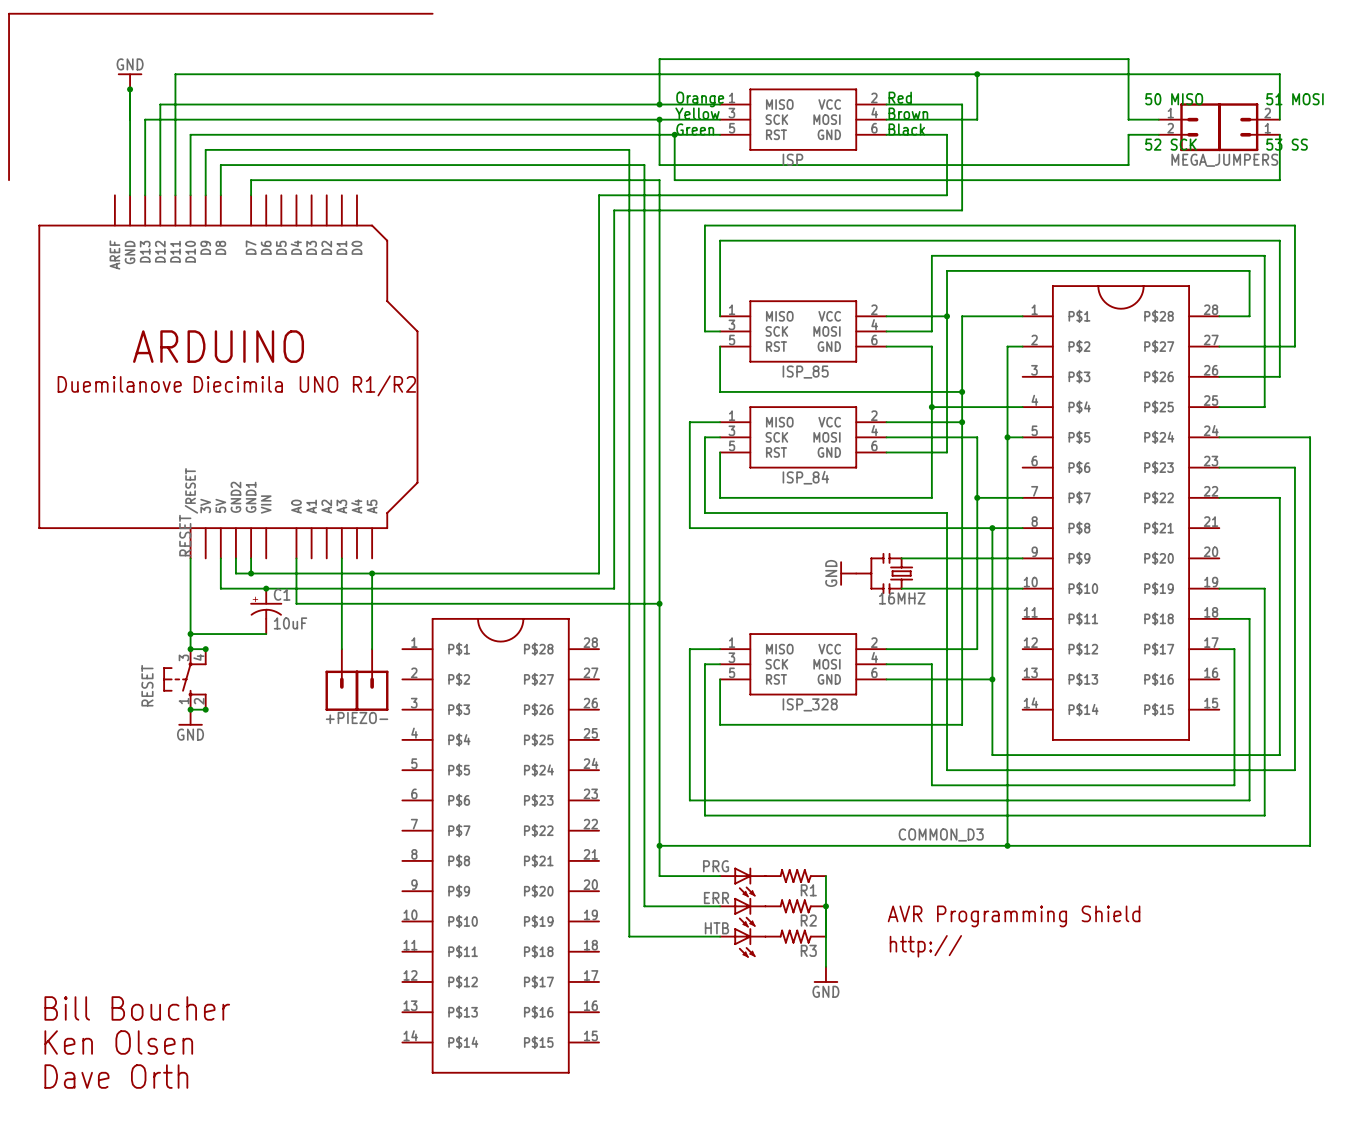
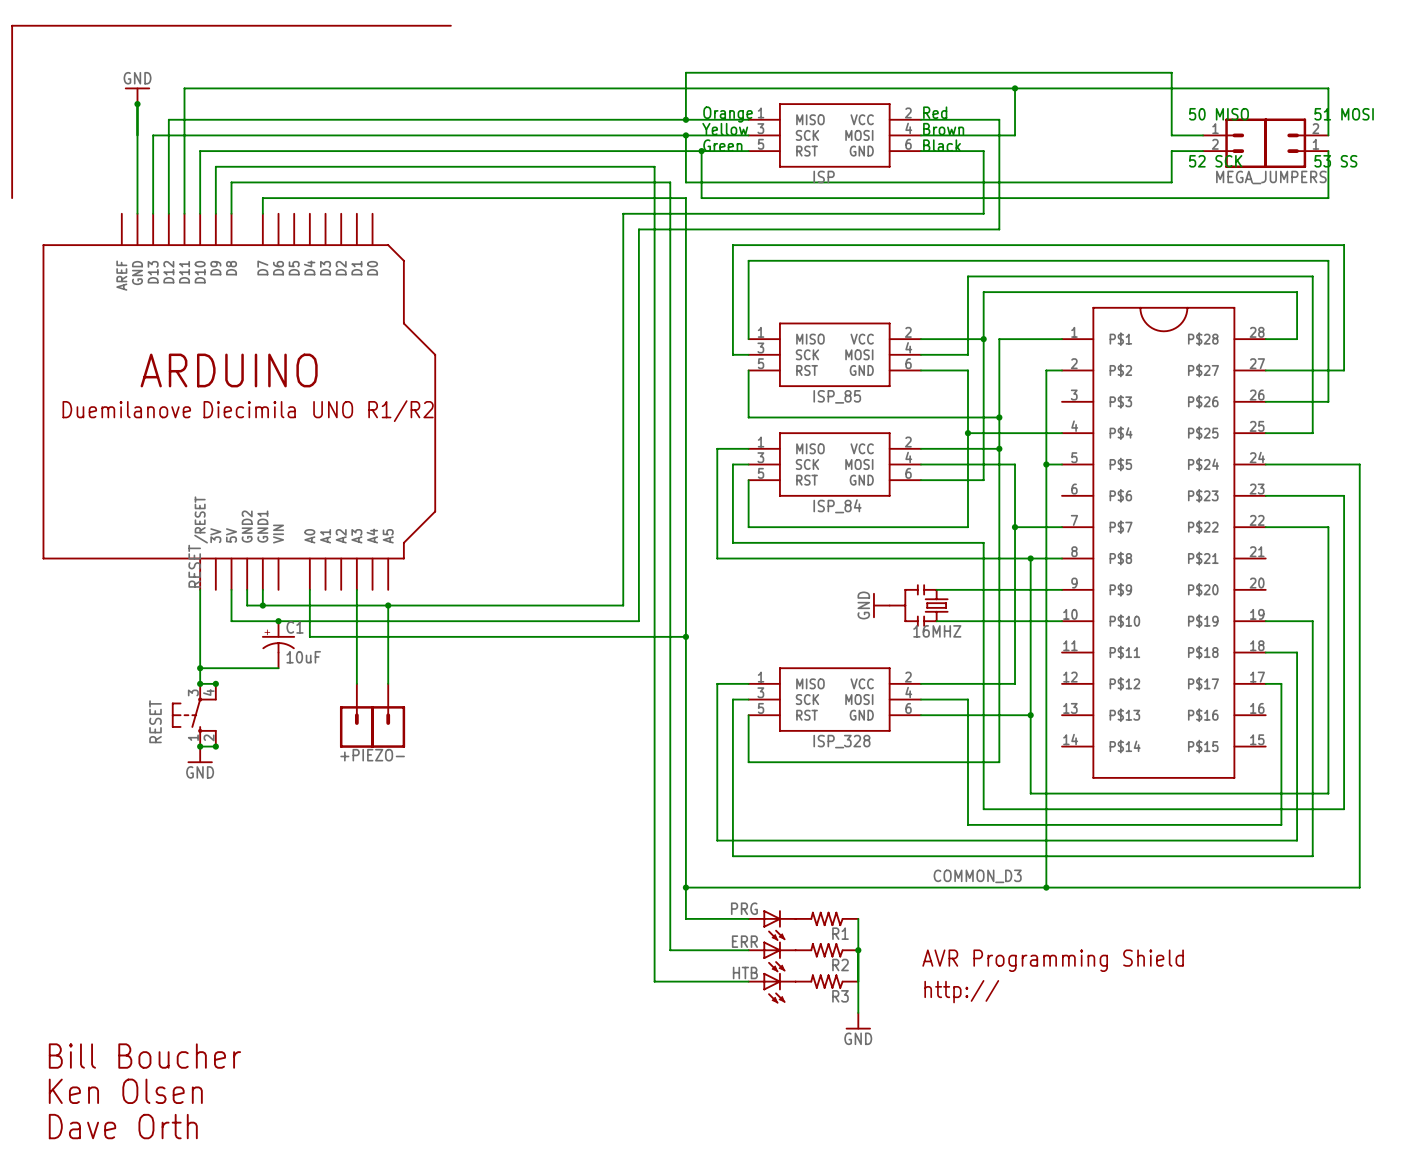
part: (500, 845) -> none

